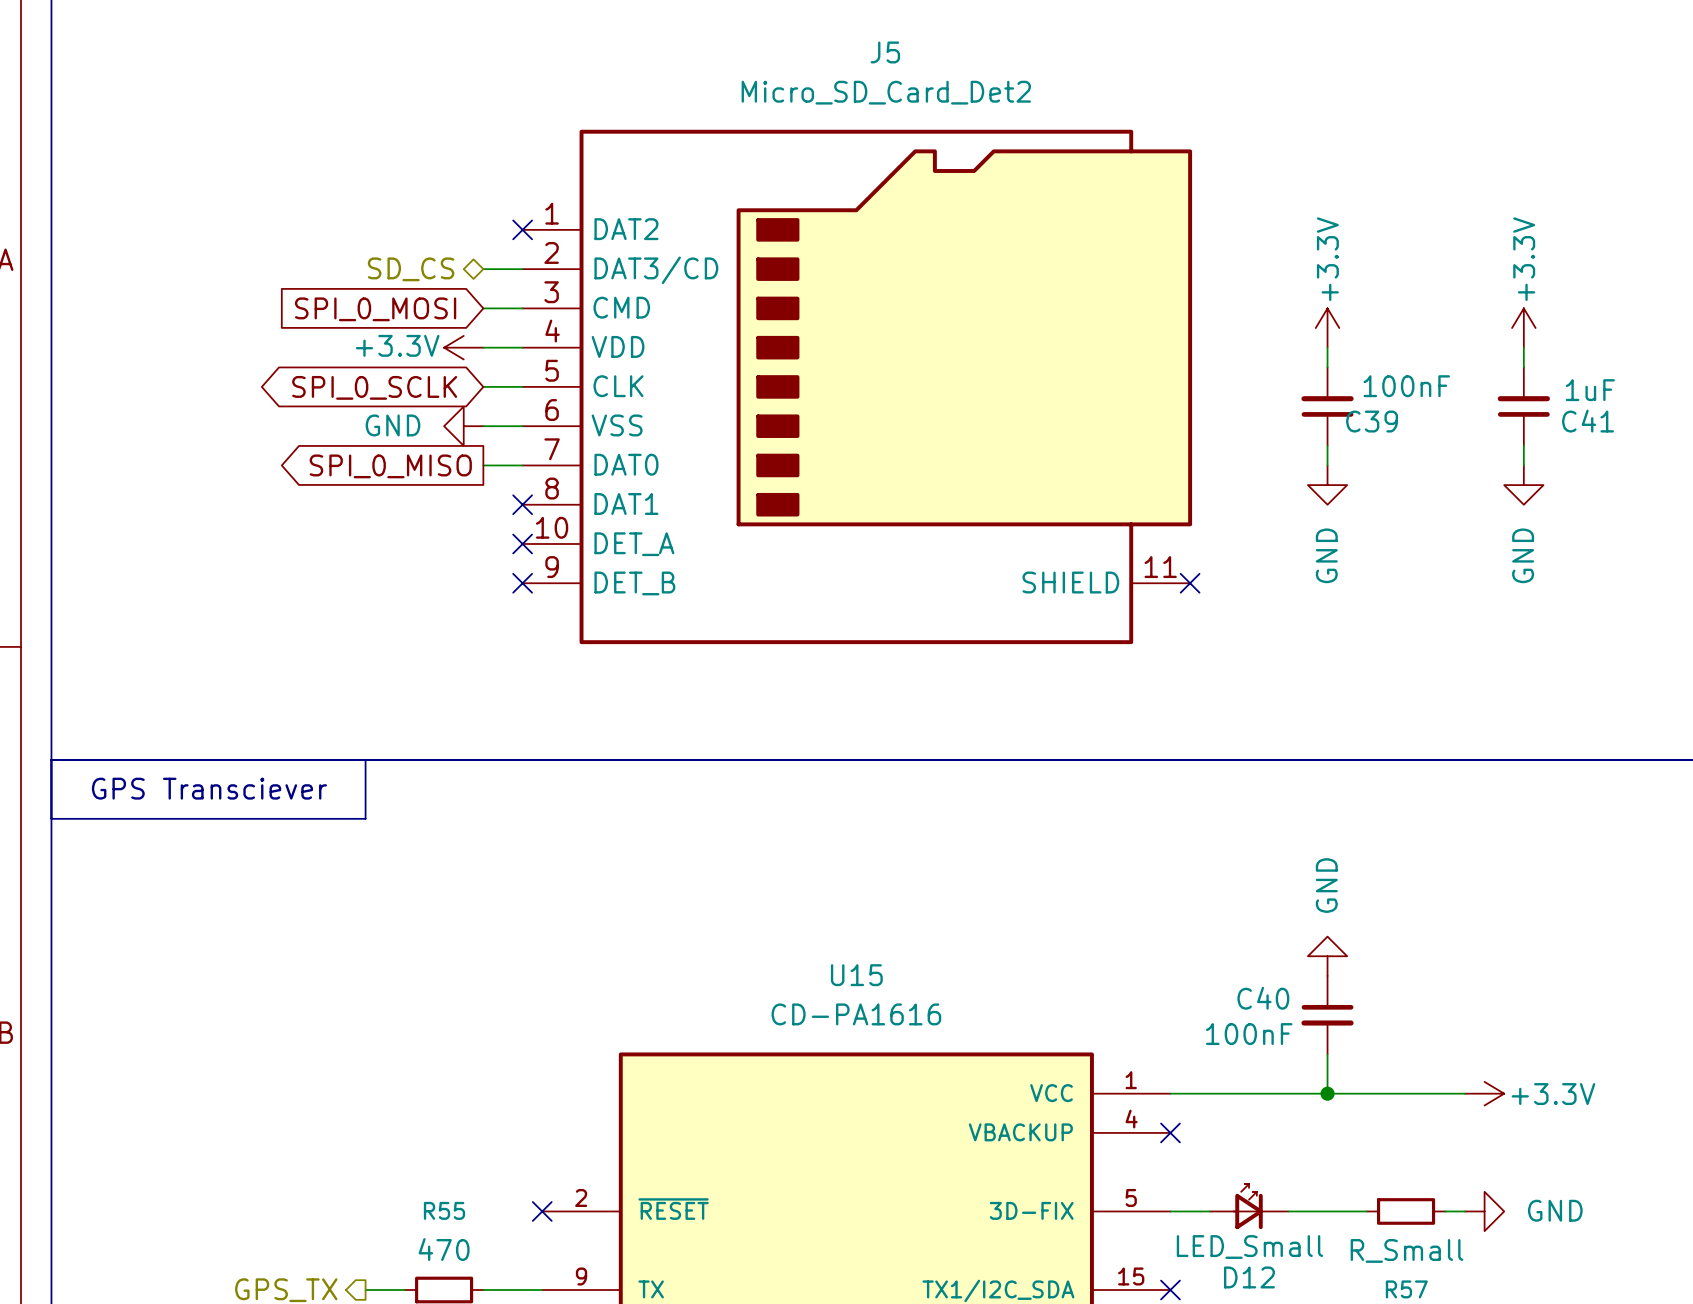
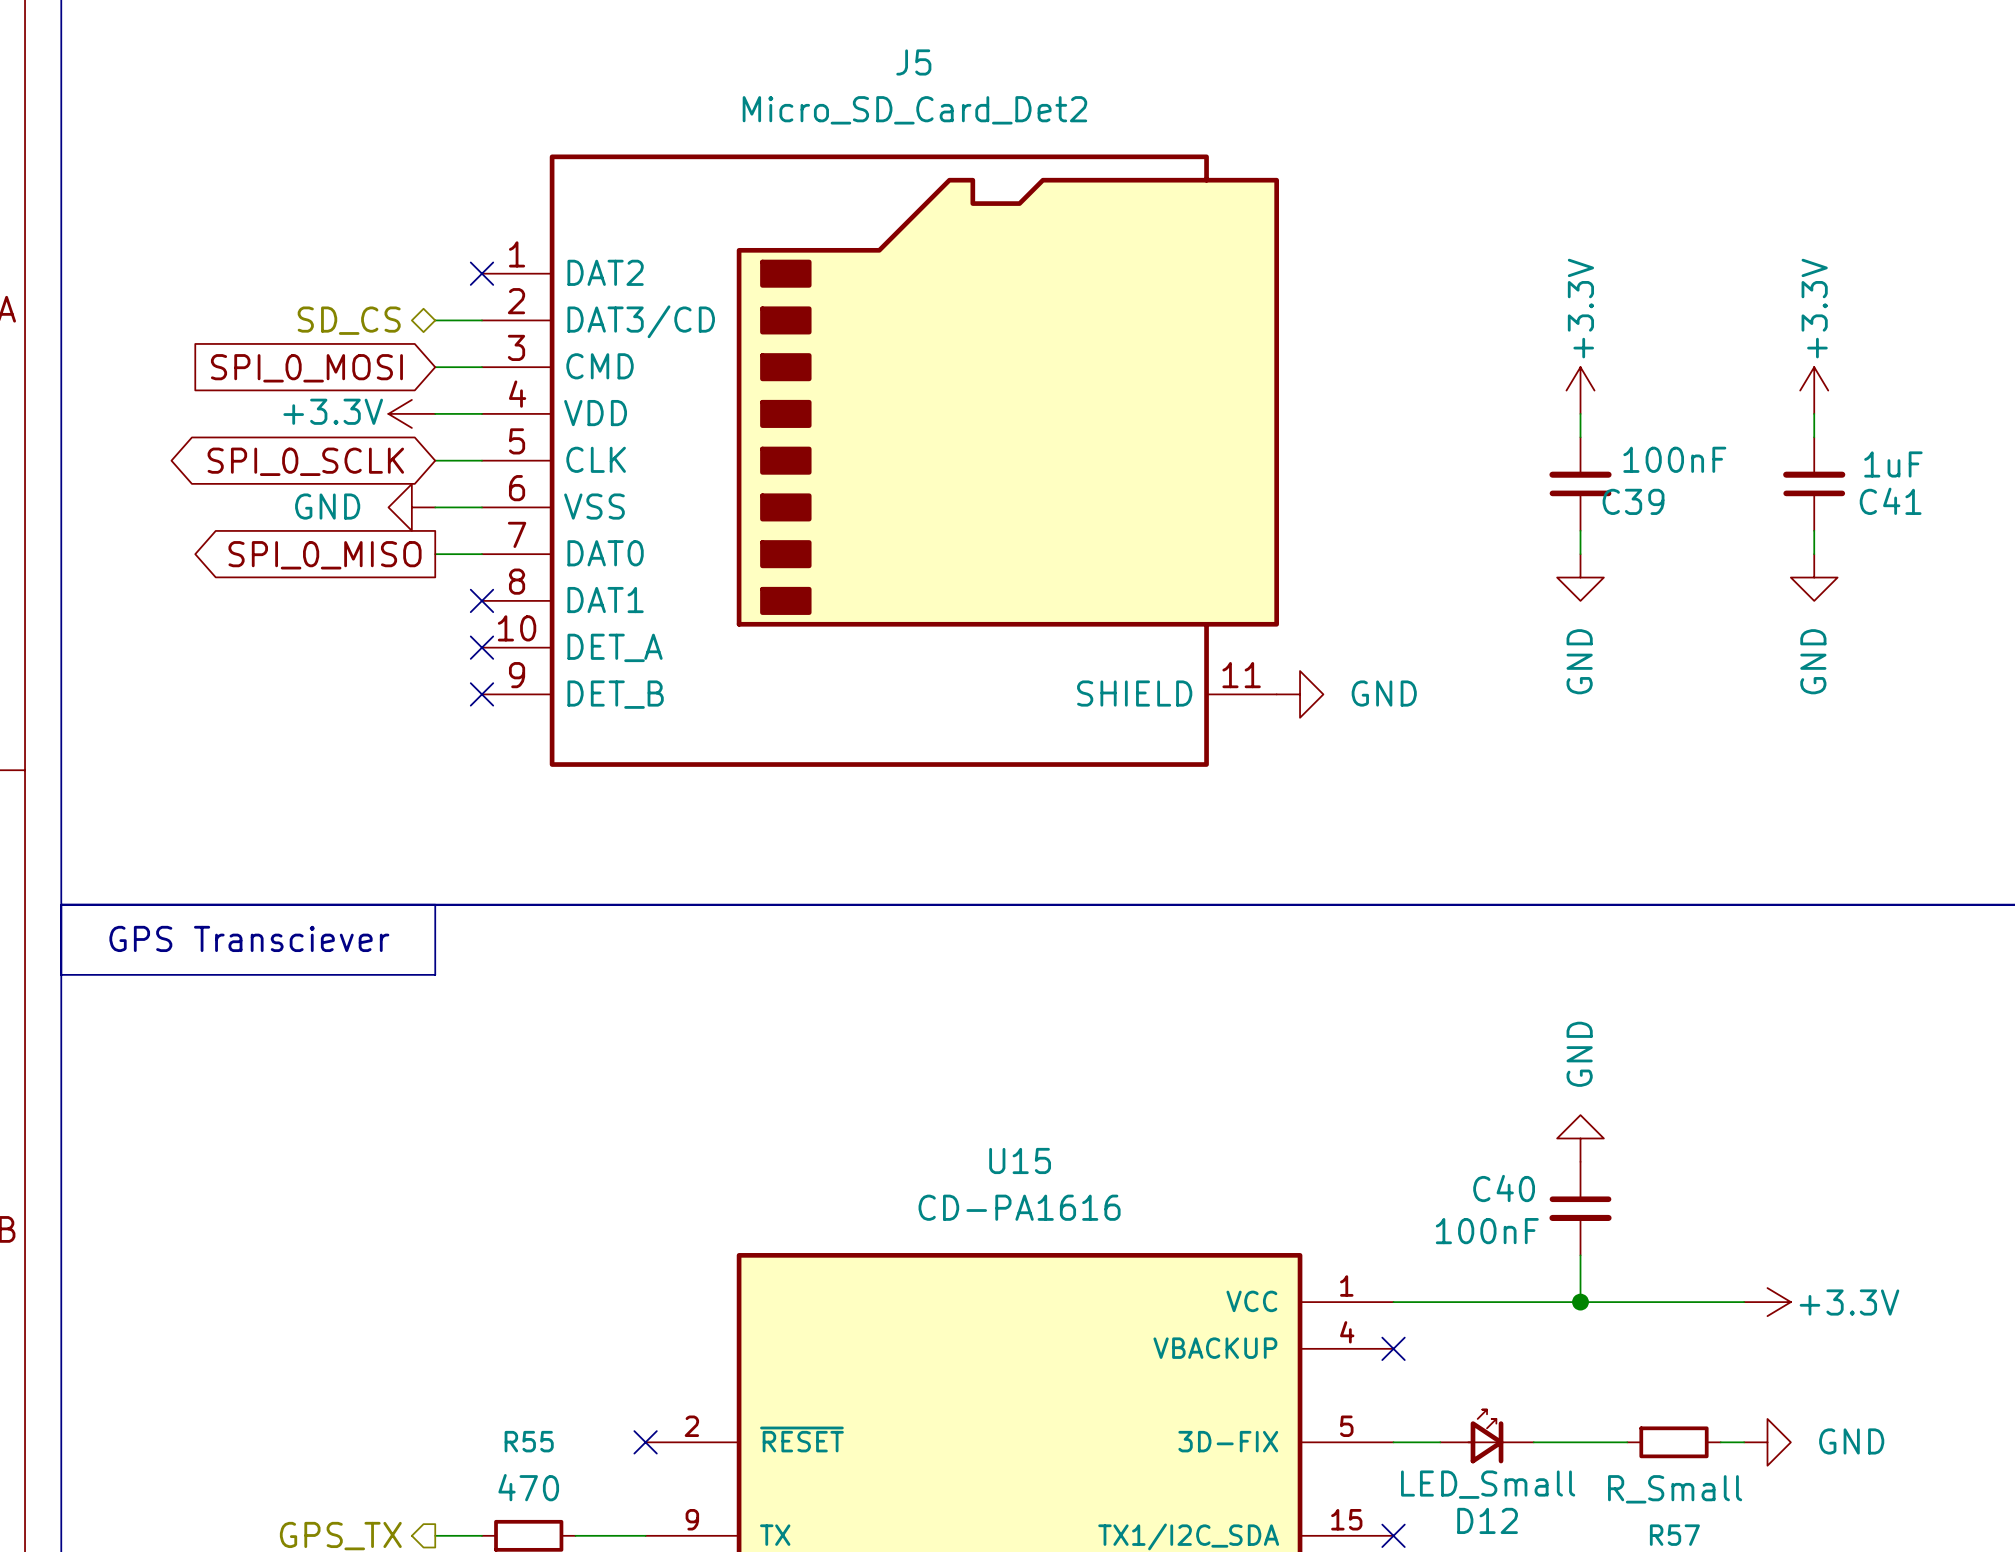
no-connect mark: none -> (481, 273)
no-connect mark: (522, 229) -> none
hierarchical label position: SD_CS (411, 269) -> SD_CS (349, 320)
wire: (483, 269) (522, 269) -> (435, 320) (481, 320)
wire: (483, 308) (522, 308) -> (435, 367) (481, 367)
global label position: SPI_0_MOSI (375, 309) -> SPI_0_MOSI (306, 368)
power symbol position: +3.3V (463, 347) -> +3.3V (411, 413)
wire: (483, 347) (522, 347) -> (435, 413) (481, 413)
wire: (483, 386) (522, 386) -> (435, 460) (481, 460)
J5 position: (857, 386) -> (880, 460)
global label position: SPI_0_SCLK (374, 387) -> SPI_0_SCLK (305, 461)
power symbol position: GND (463, 426) -> GND (411, 507)
wire: (483, 426) (522, 426) -> (435, 507) (481, 507)
wire: (483, 465) (522, 465) -> (435, 554) (481, 554)
global label position: SPI_0_MISO (390, 466) -> SPI_0_MISO (325, 555)
no-connect mark: none -> (481, 600)
no-connect mark: (522, 504) -> none
no-connect mark: none -> (481, 647)
no-connect mark: (522, 543) -> none
no-connect mark: none -> (481, 694)
no-connect mark: (522, 583) -> none
power symbol: none -> GND (1300, 694)
no-connect mark: (1190, 583) -> none

